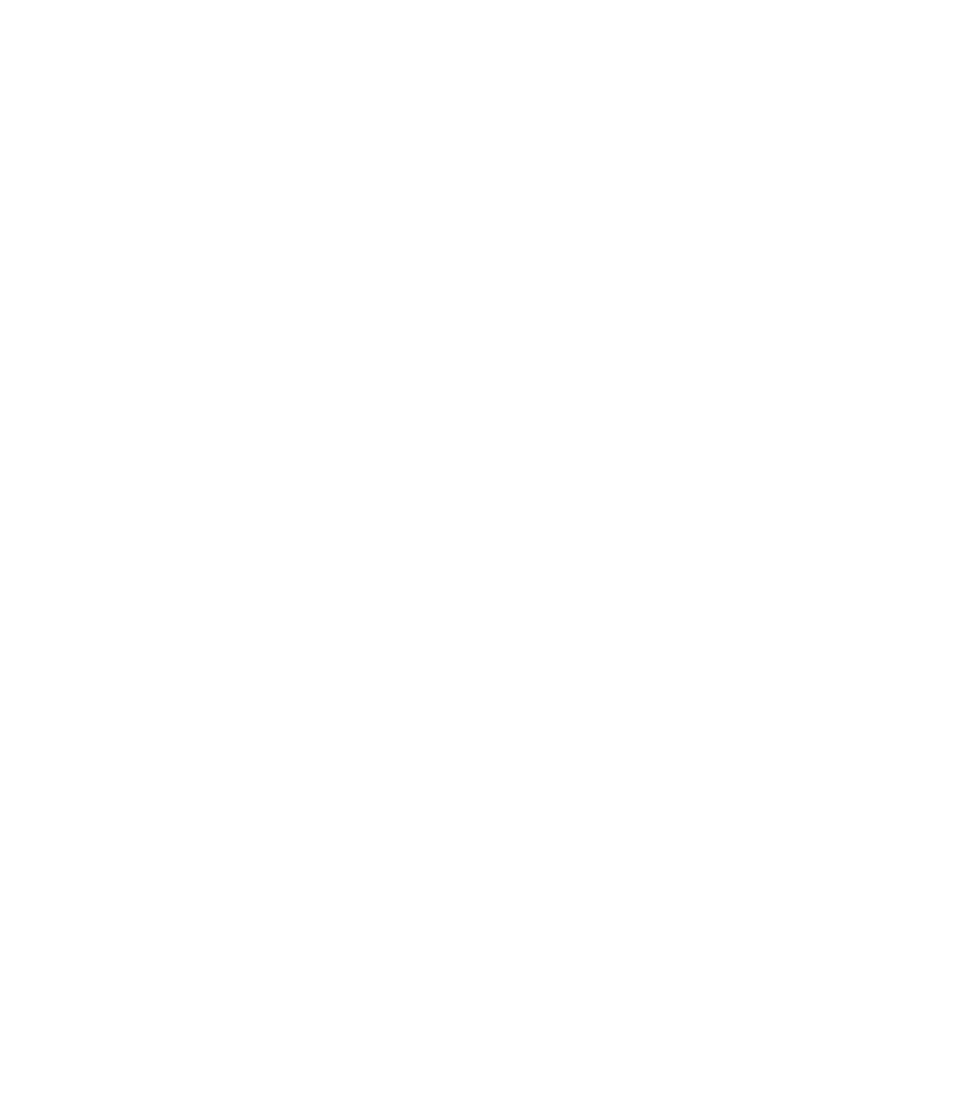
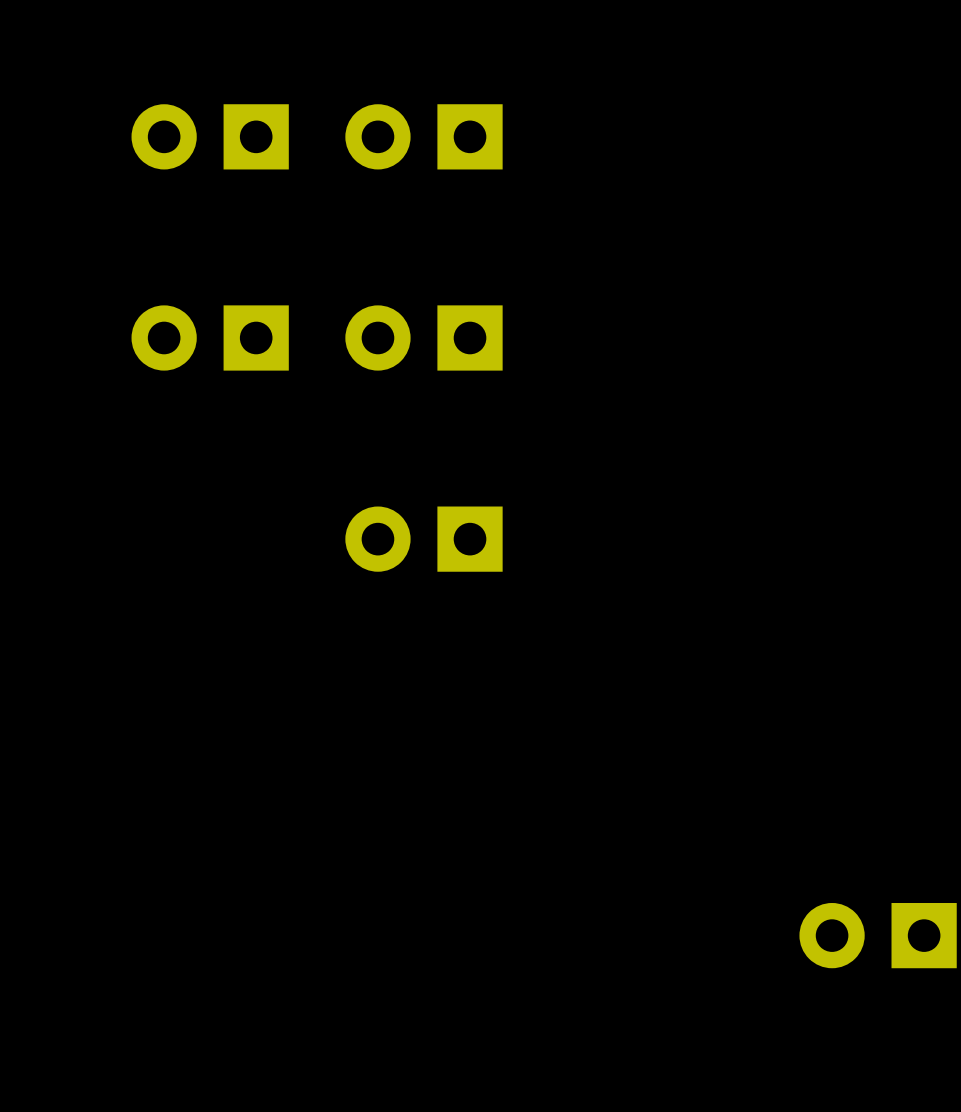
part: none -> (210, 136)
part: none -> (423, 136)
part: none -> (210, 337)
part: none -> (423, 337)
part: none -> (423, 539)
part: none -> (878, 935)

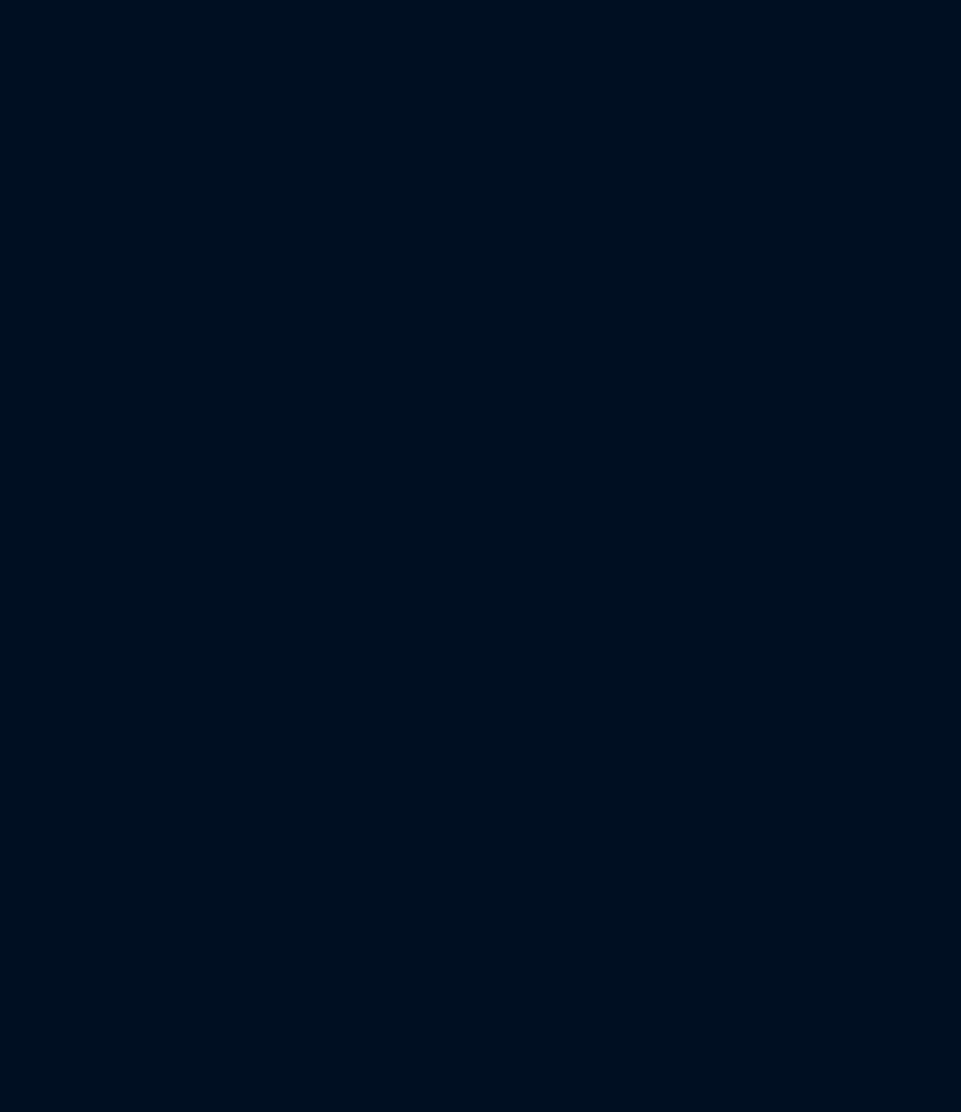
part: (210, 136) -> none
part: (423, 136) -> none
part: (210, 337) -> none
part: (423, 337) -> none
part: (423, 539) -> none
part: (878, 935) -> none

